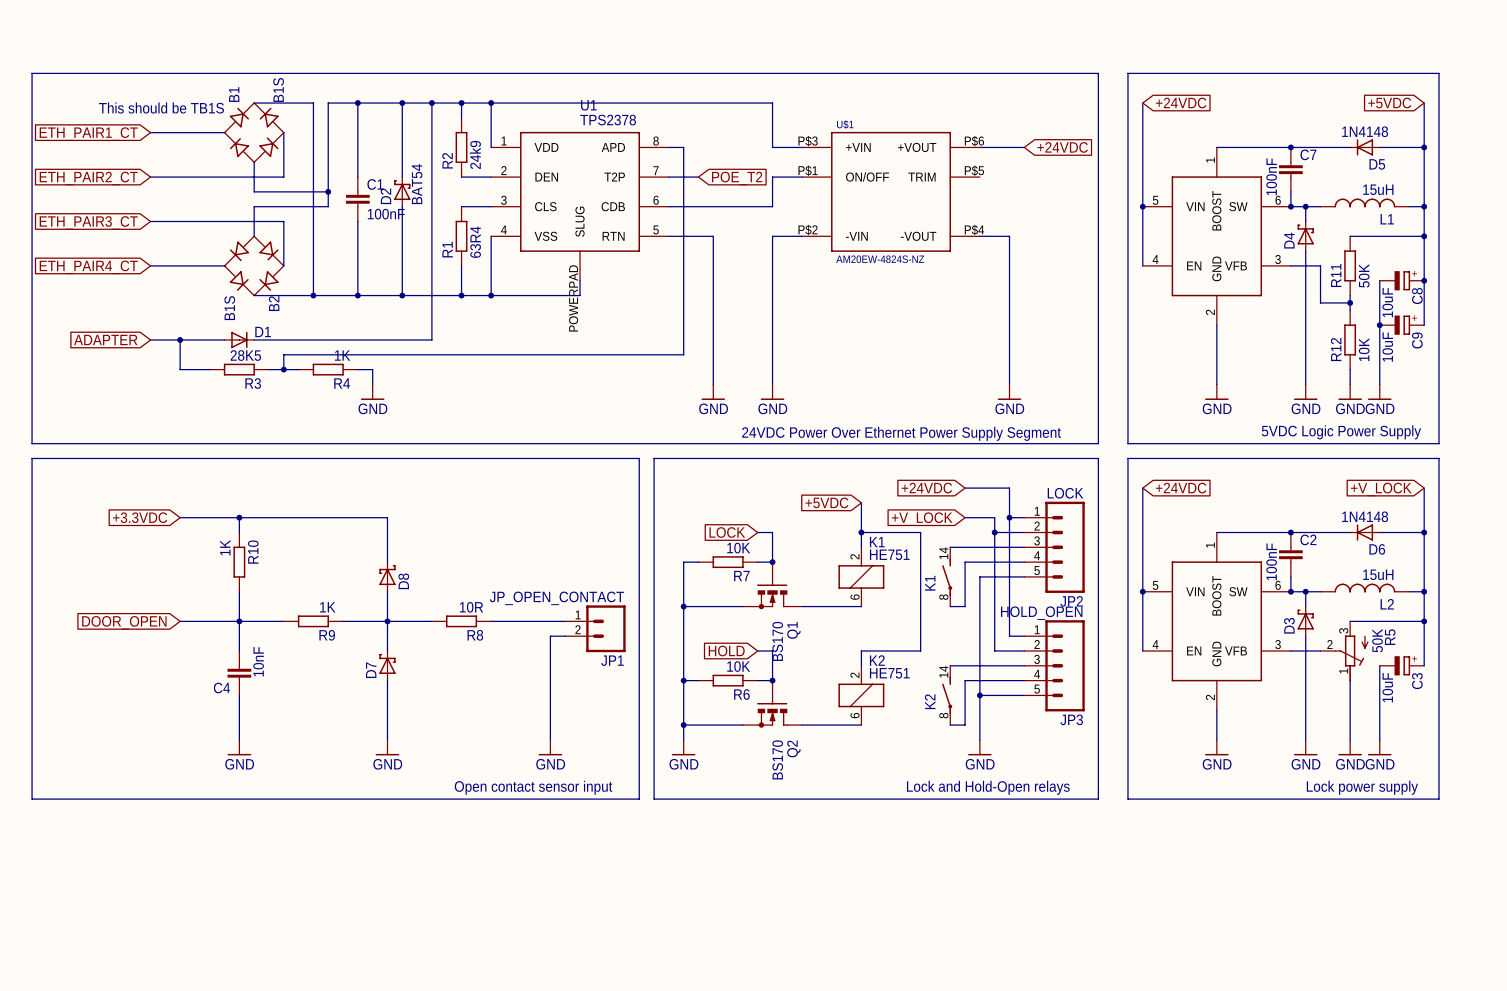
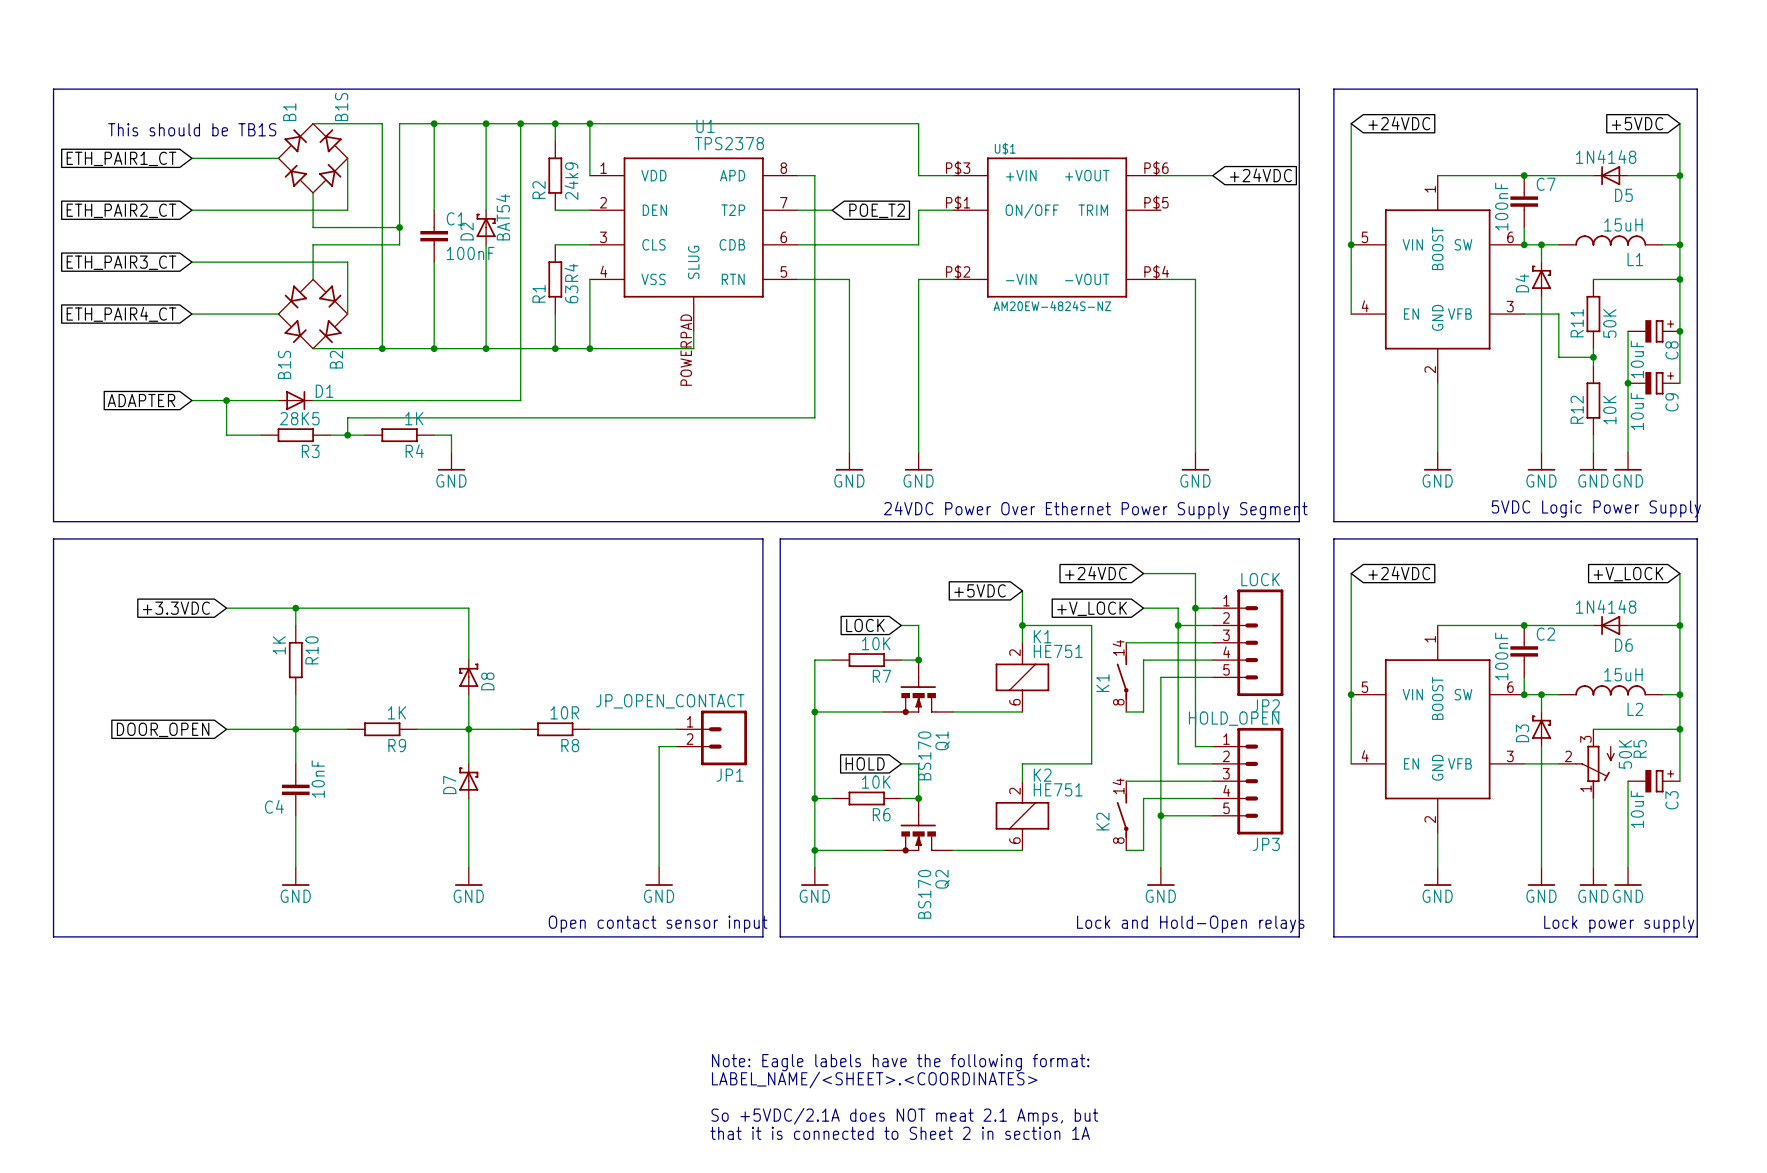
text: none -> Note: Eagle labels have the following format: (900, 1062)
text: none -> LABEL_NAME/<SHEET>.<COORDINATES> (874, 1079)
text: none -> So +5VDC/2.1A does NOT meat 2.1 Amps, but (904, 1116)
text: none -> that it is connected to Sheet 2 in section 1A (900, 1133)

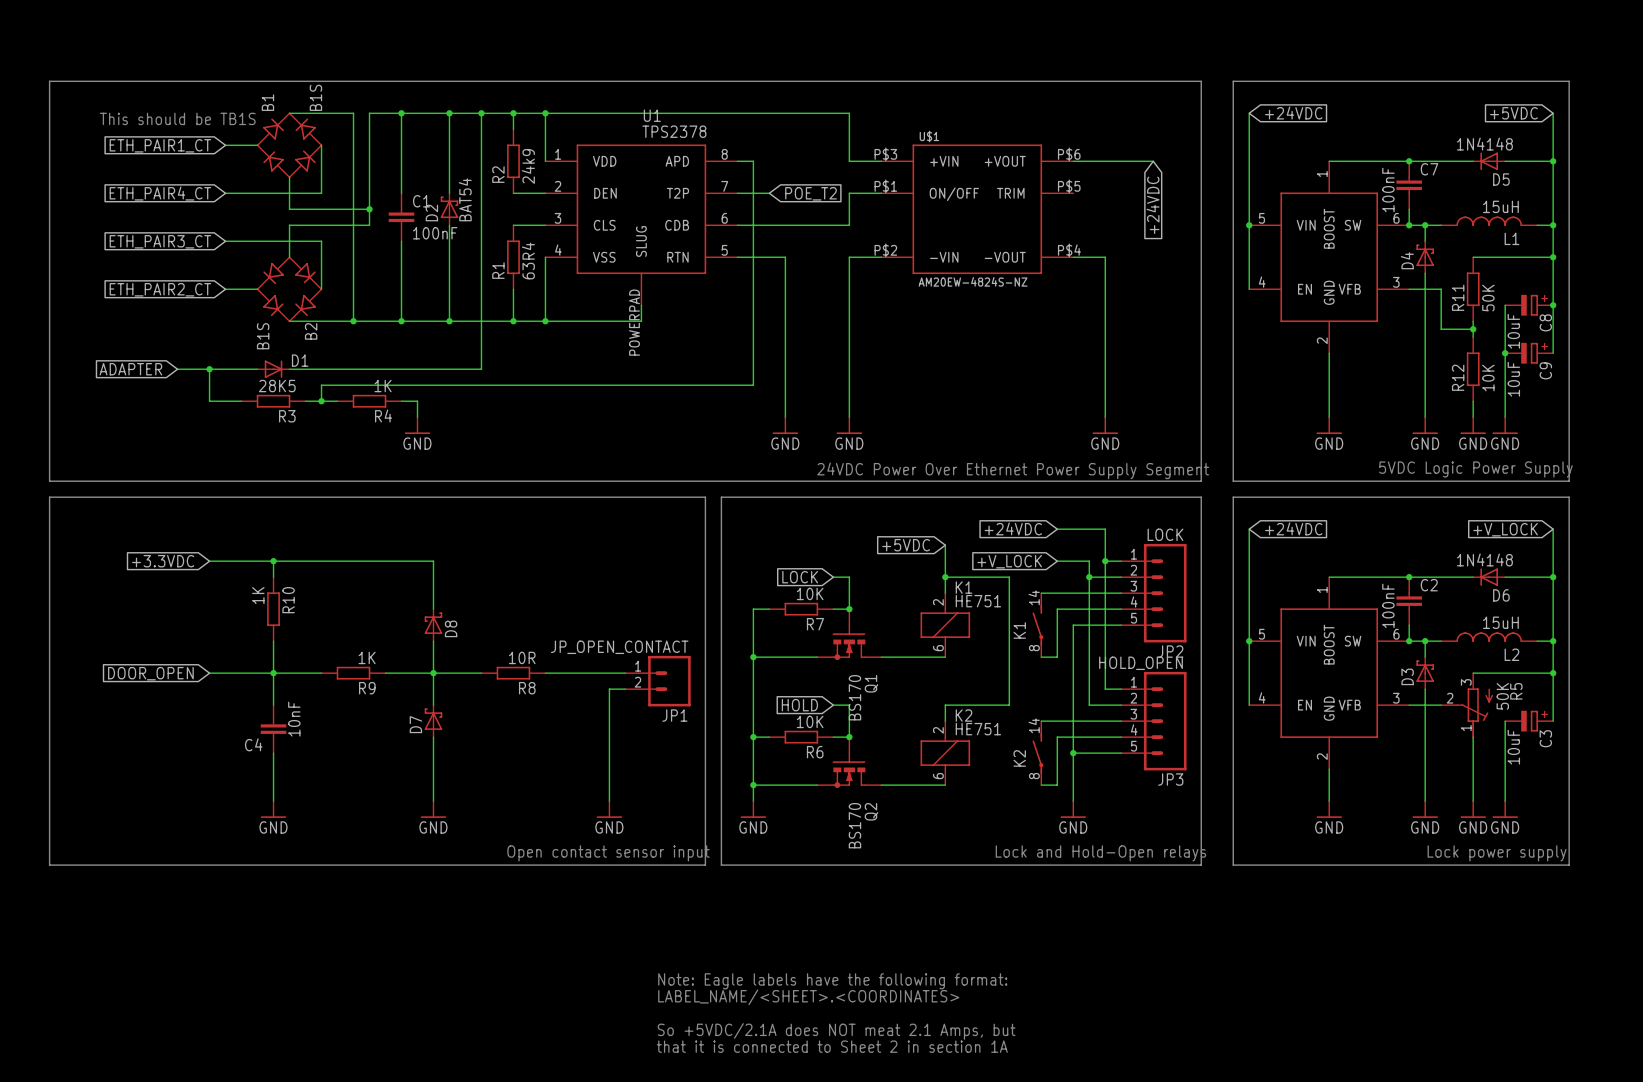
global label position: ETH_PAIR1_CT (121, 158) -> ETH_PAIR1_CT (160, 145)
wire: (191, 158) (243, 158) -> none
wire: none -> (1121, 161) (1153, 161)
global label rotation: 0° (1260, 175) -> 90° clockwise (1153, 205)
global label position: ETH_PAIR2_CT (121, 210) -> ETH_PAIR2_CT (160, 289)
wire: (191, 210) (243, 210) -> none
global label position: ETH_PAIR3_CT (121, 262) -> ETH_PAIR3_CT (160, 241)
wire: (191, 262) (243, 262) -> none
global label position: ETH_PAIR4_CT (121, 314) -> ETH_PAIR4_CT (160, 193)
wire: (191, 314) (243, 314) -> none

